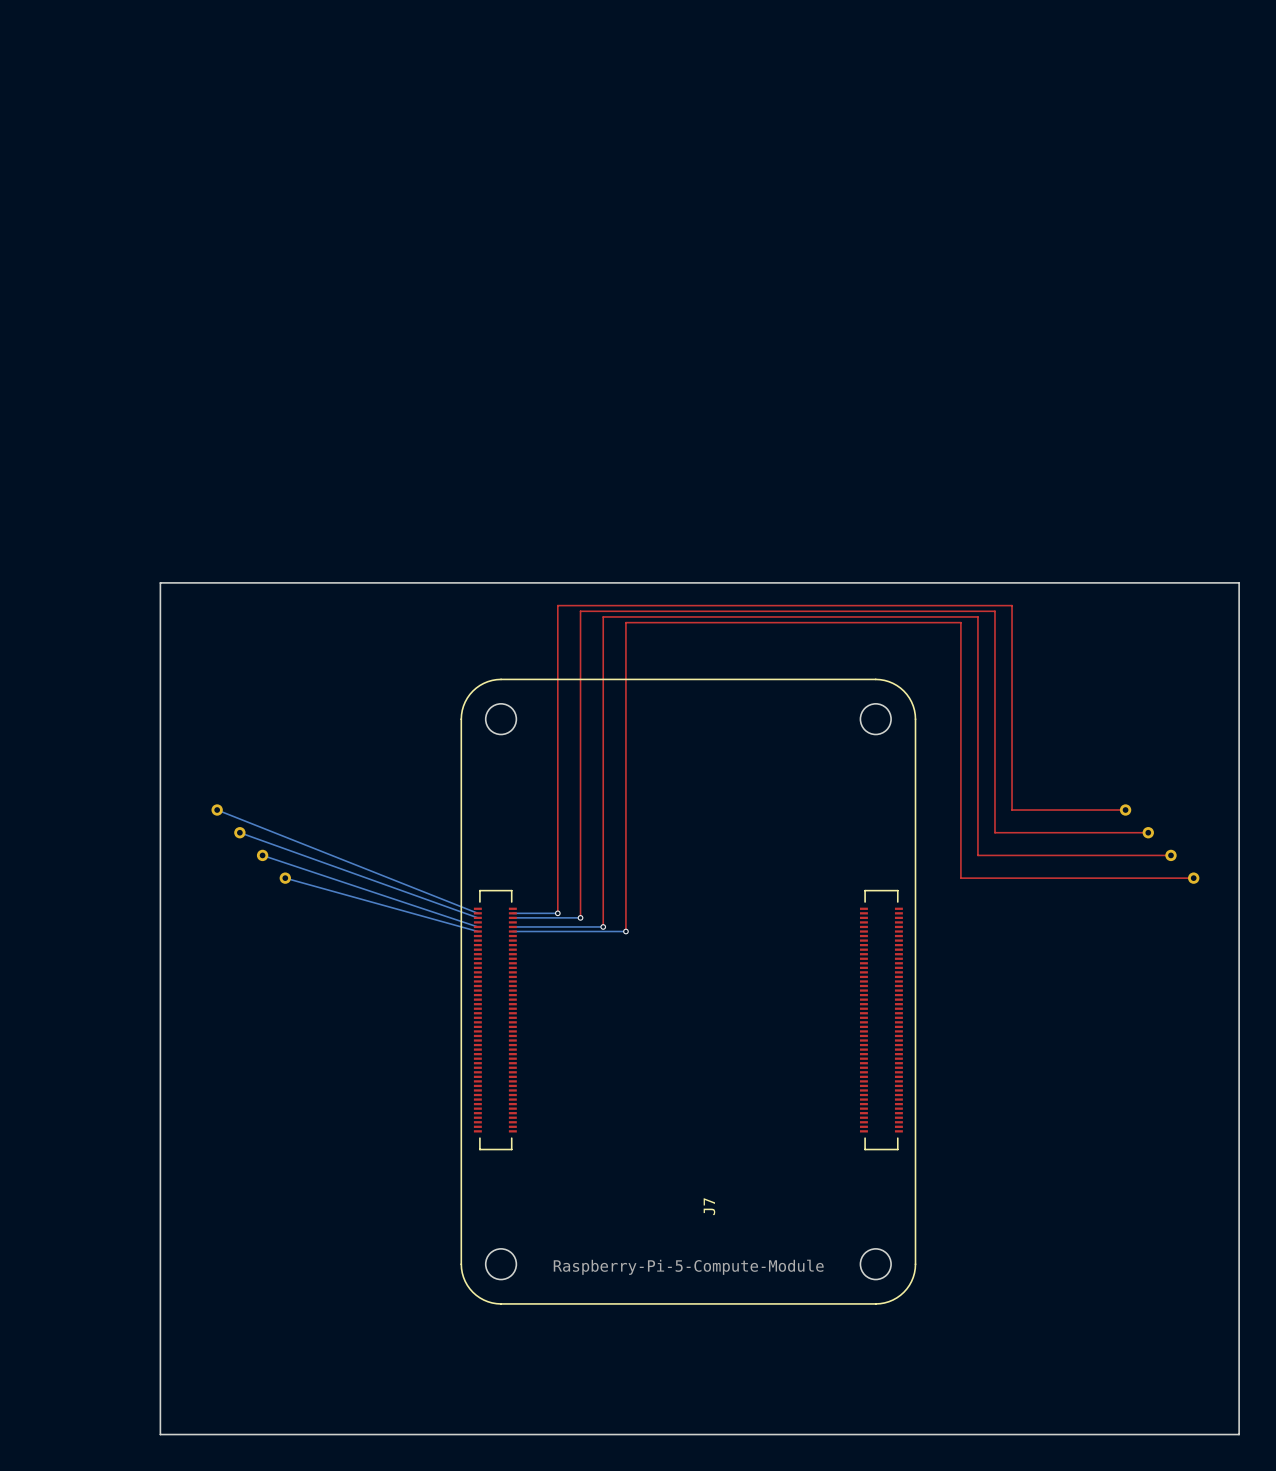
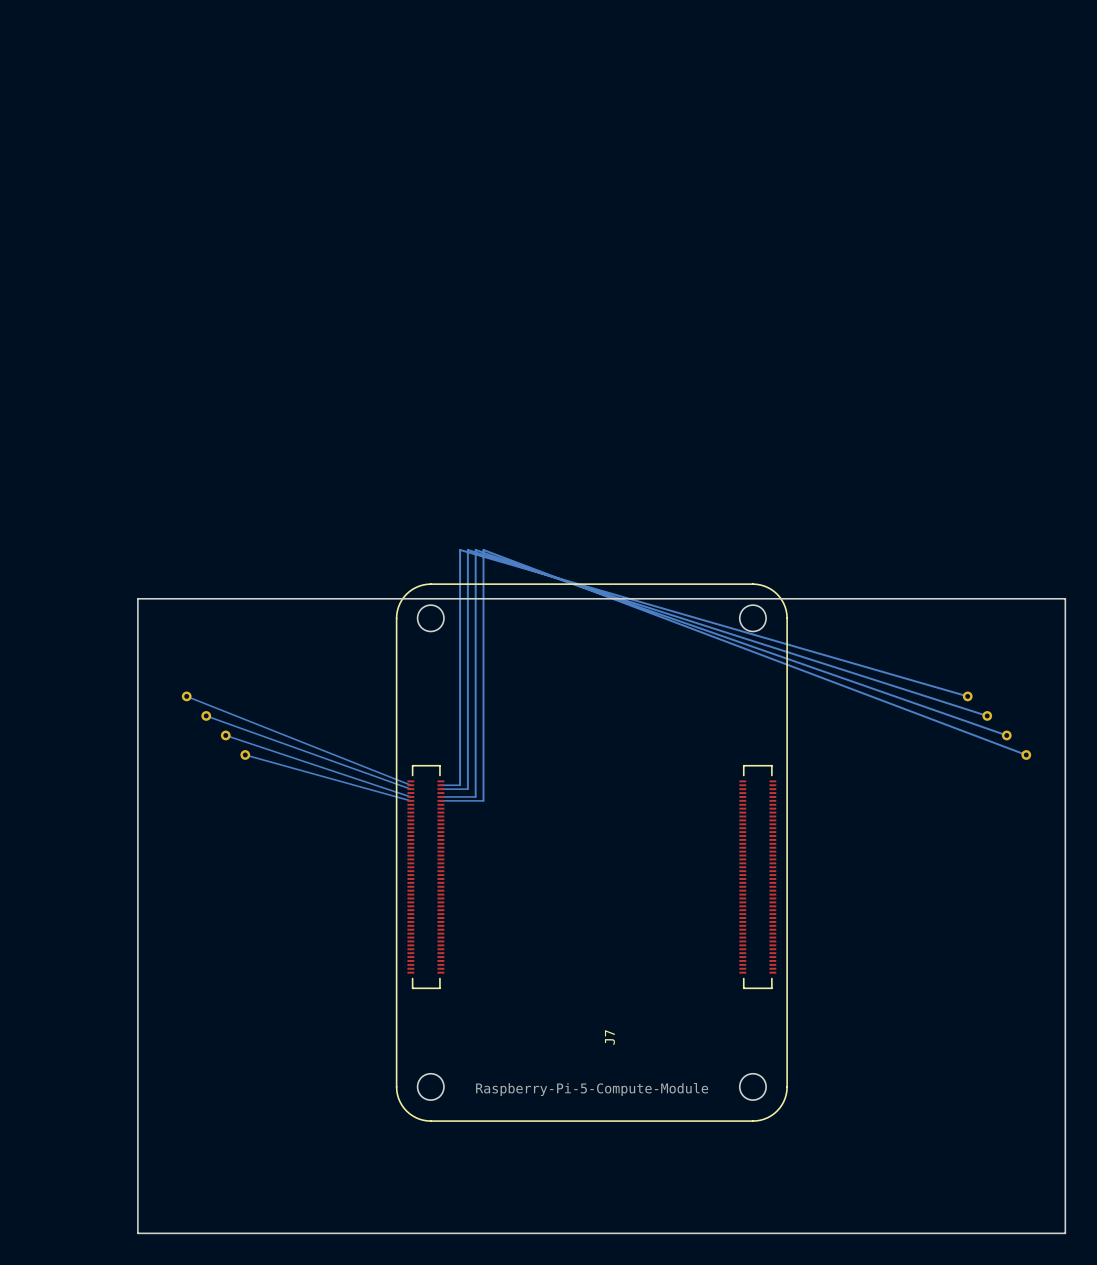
board edge: (160, 696) (160, 582) (1239, 582) (1239, 696) -> (137, 598) (1065, 598)
top track: (1125, 810) (1012, 810) (1012, 605) (557, 605) (557, 913) -> none
top track: (1148, 832) (994, 832) (994, 611) (580, 611) (580, 917) -> none
top track: (1170, 855) (977, 855) (977, 616) (603, 616) (603, 926) -> none
top track: (1193, 878) (960, 878) (960, 622) (625, 622) (625, 931) -> none
bottom track: (535, 913) (557, 913) -> (460, 785) (460, 549) (967, 696)
via: (557, 913) -> none
bottom track: (544, 917) (580, 917) -> (467, 789) (467, 549) (987, 715)
via: (580, 917) -> none
bottom track: (553, 926) (603, 926) -> (475, 796) (475, 549) (1006, 735)
via: (603, 926) -> none
bottom track: (562, 931) (625, 931) -> (483, 800) (483, 549) (1026, 754)
via: (625, 931) -> none

